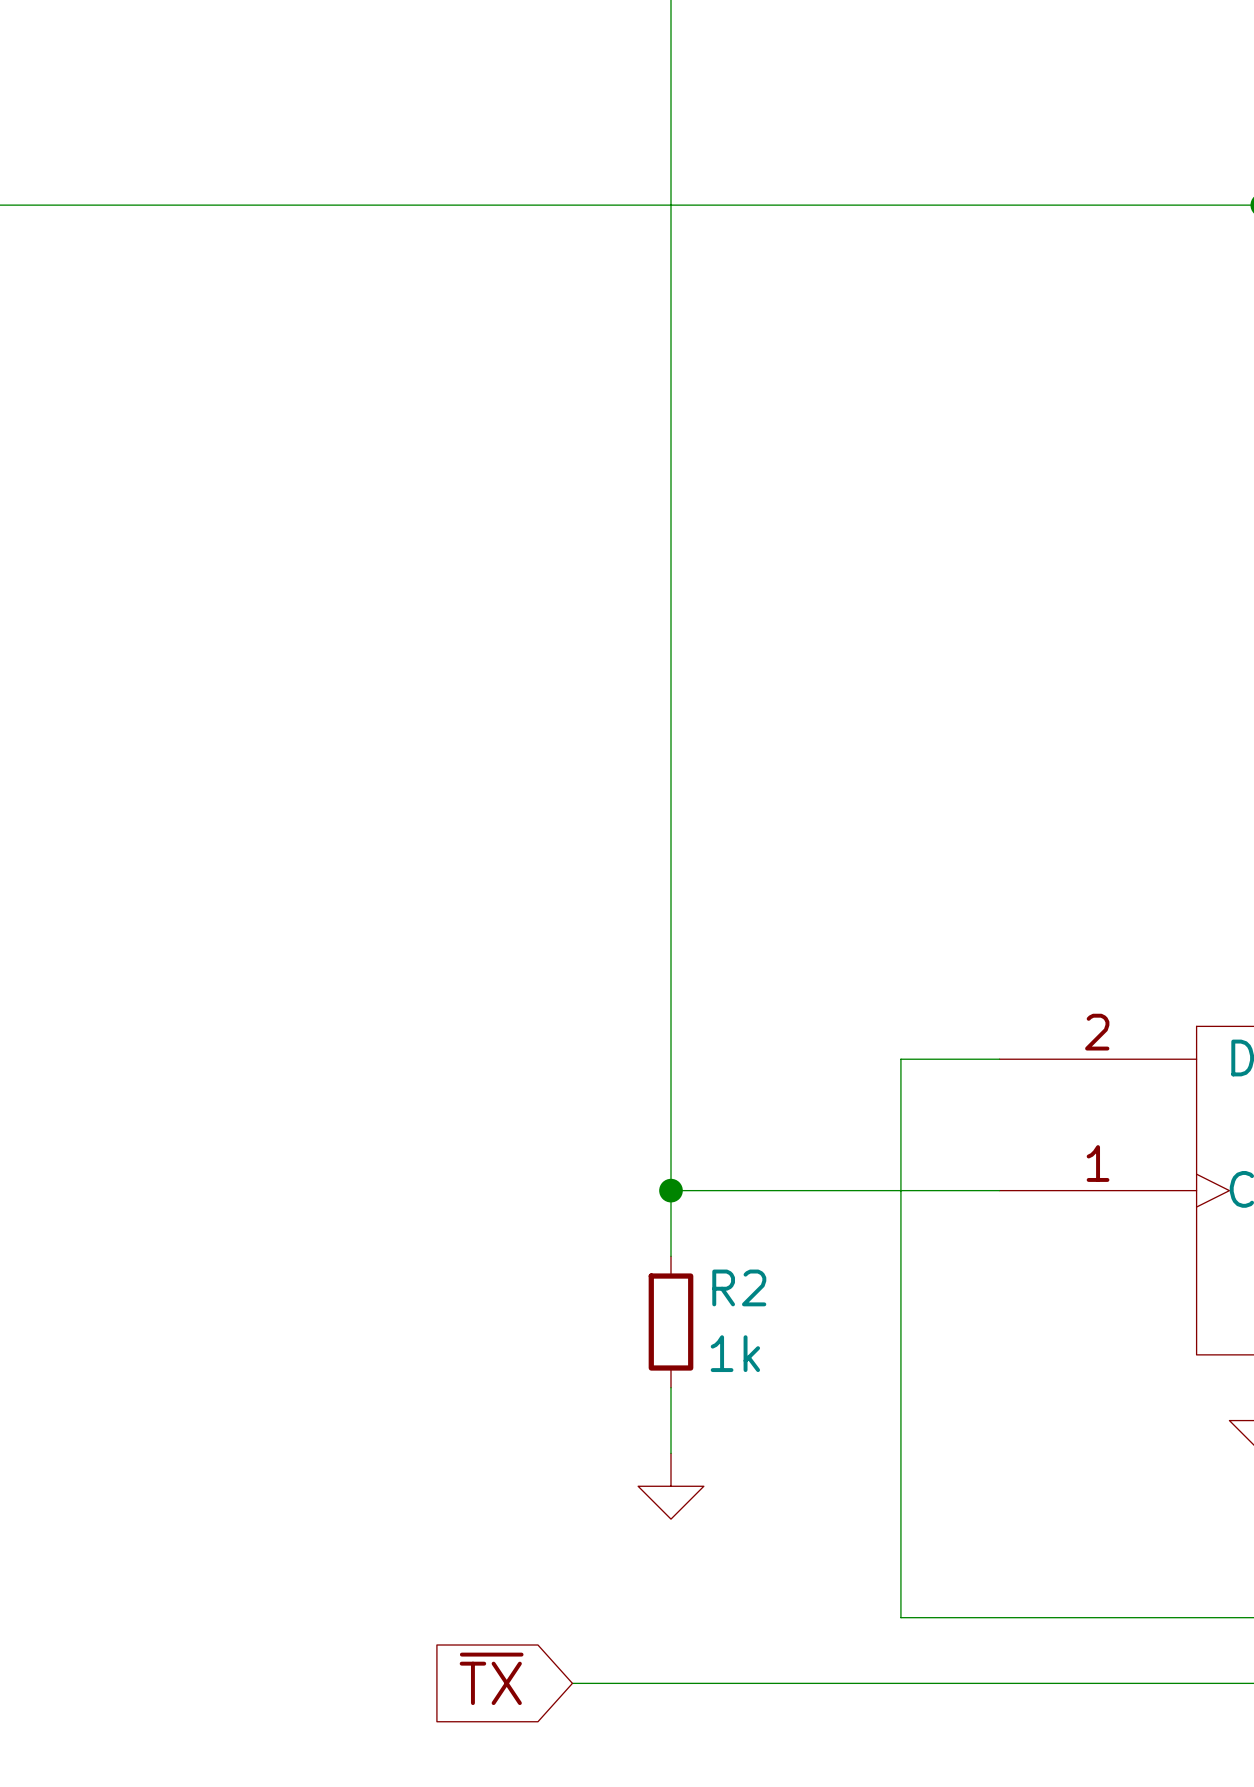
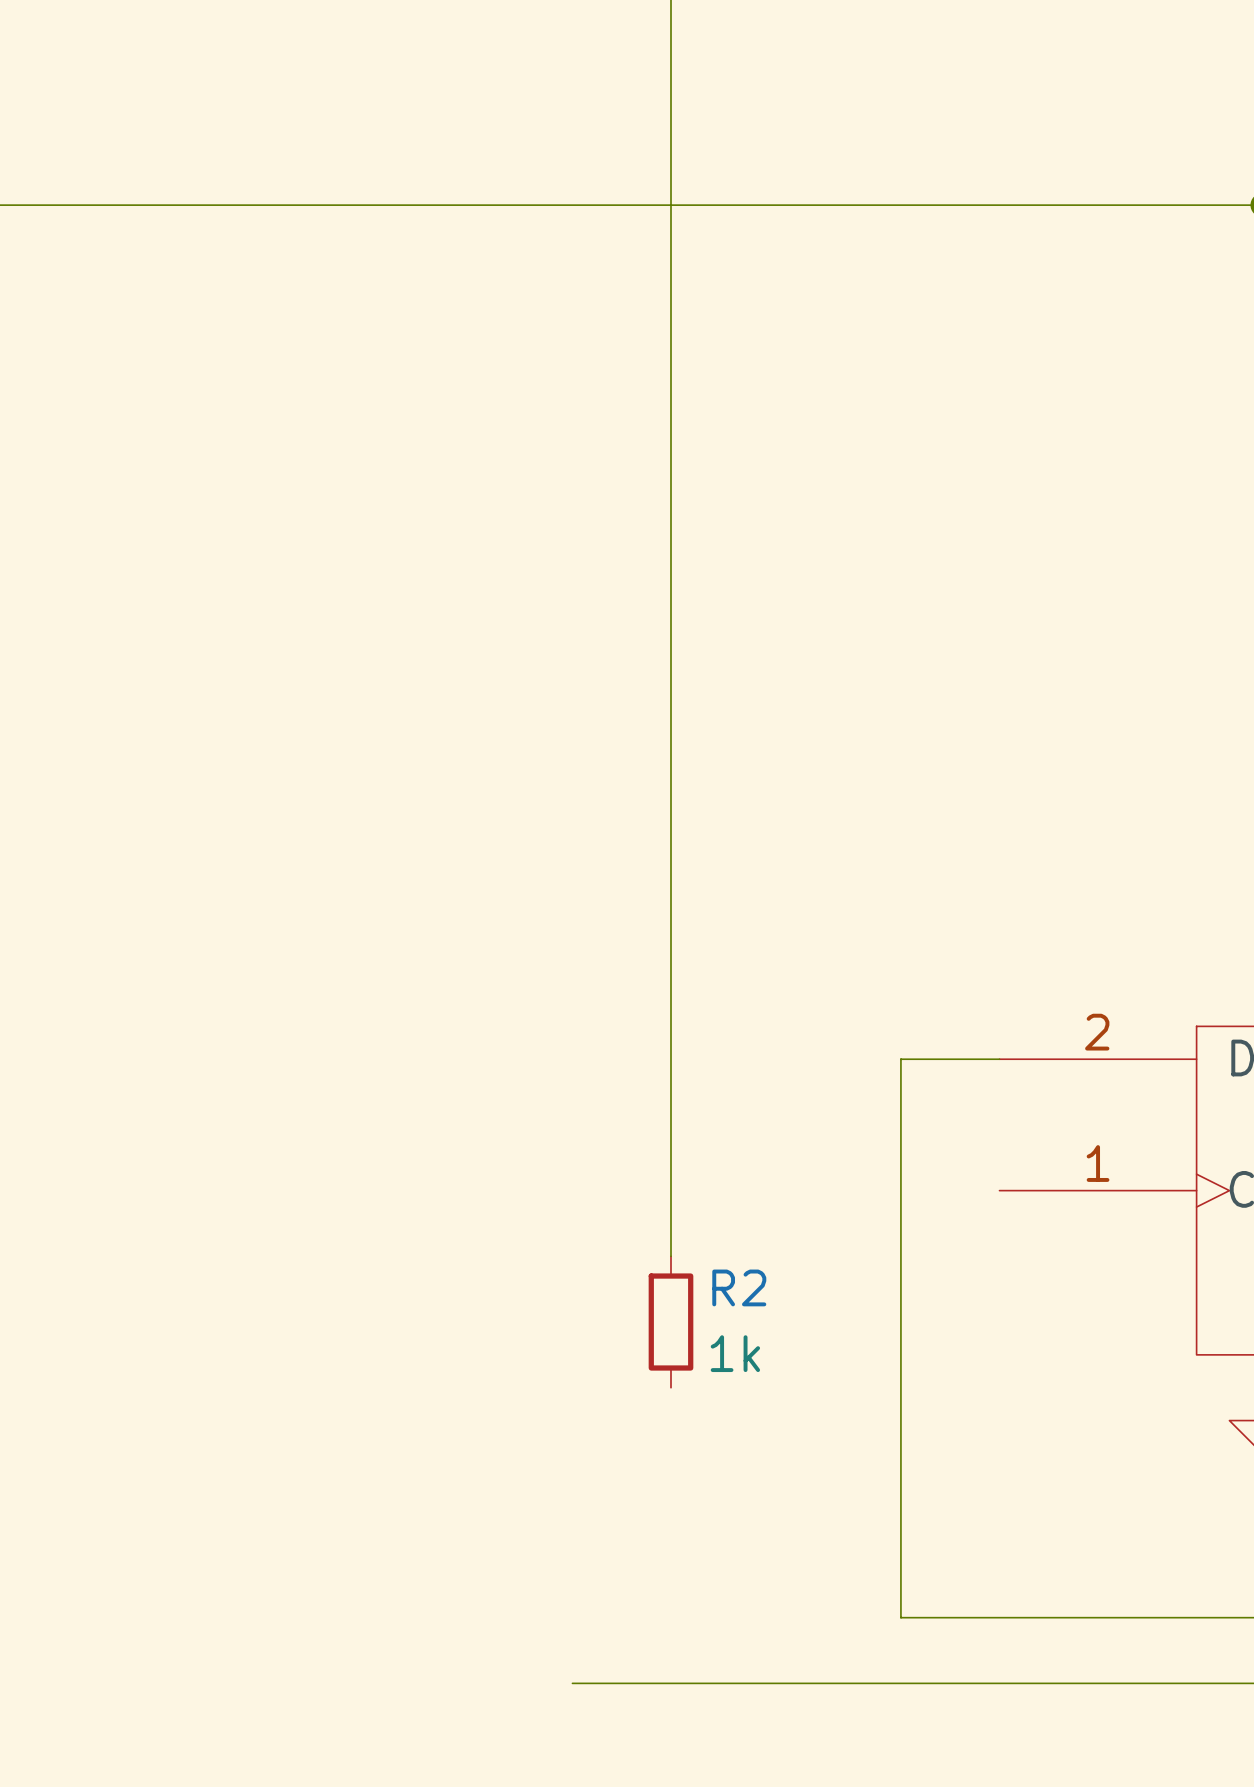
wire: (670, 1190) (999, 1190) -> none
junction: (670, 1190) -> none
wire: (670, 1387) (670, 1453) -> none
power symbol: (670, 1486) -> none
global label: ~{TX} (491, 1678) -> none

